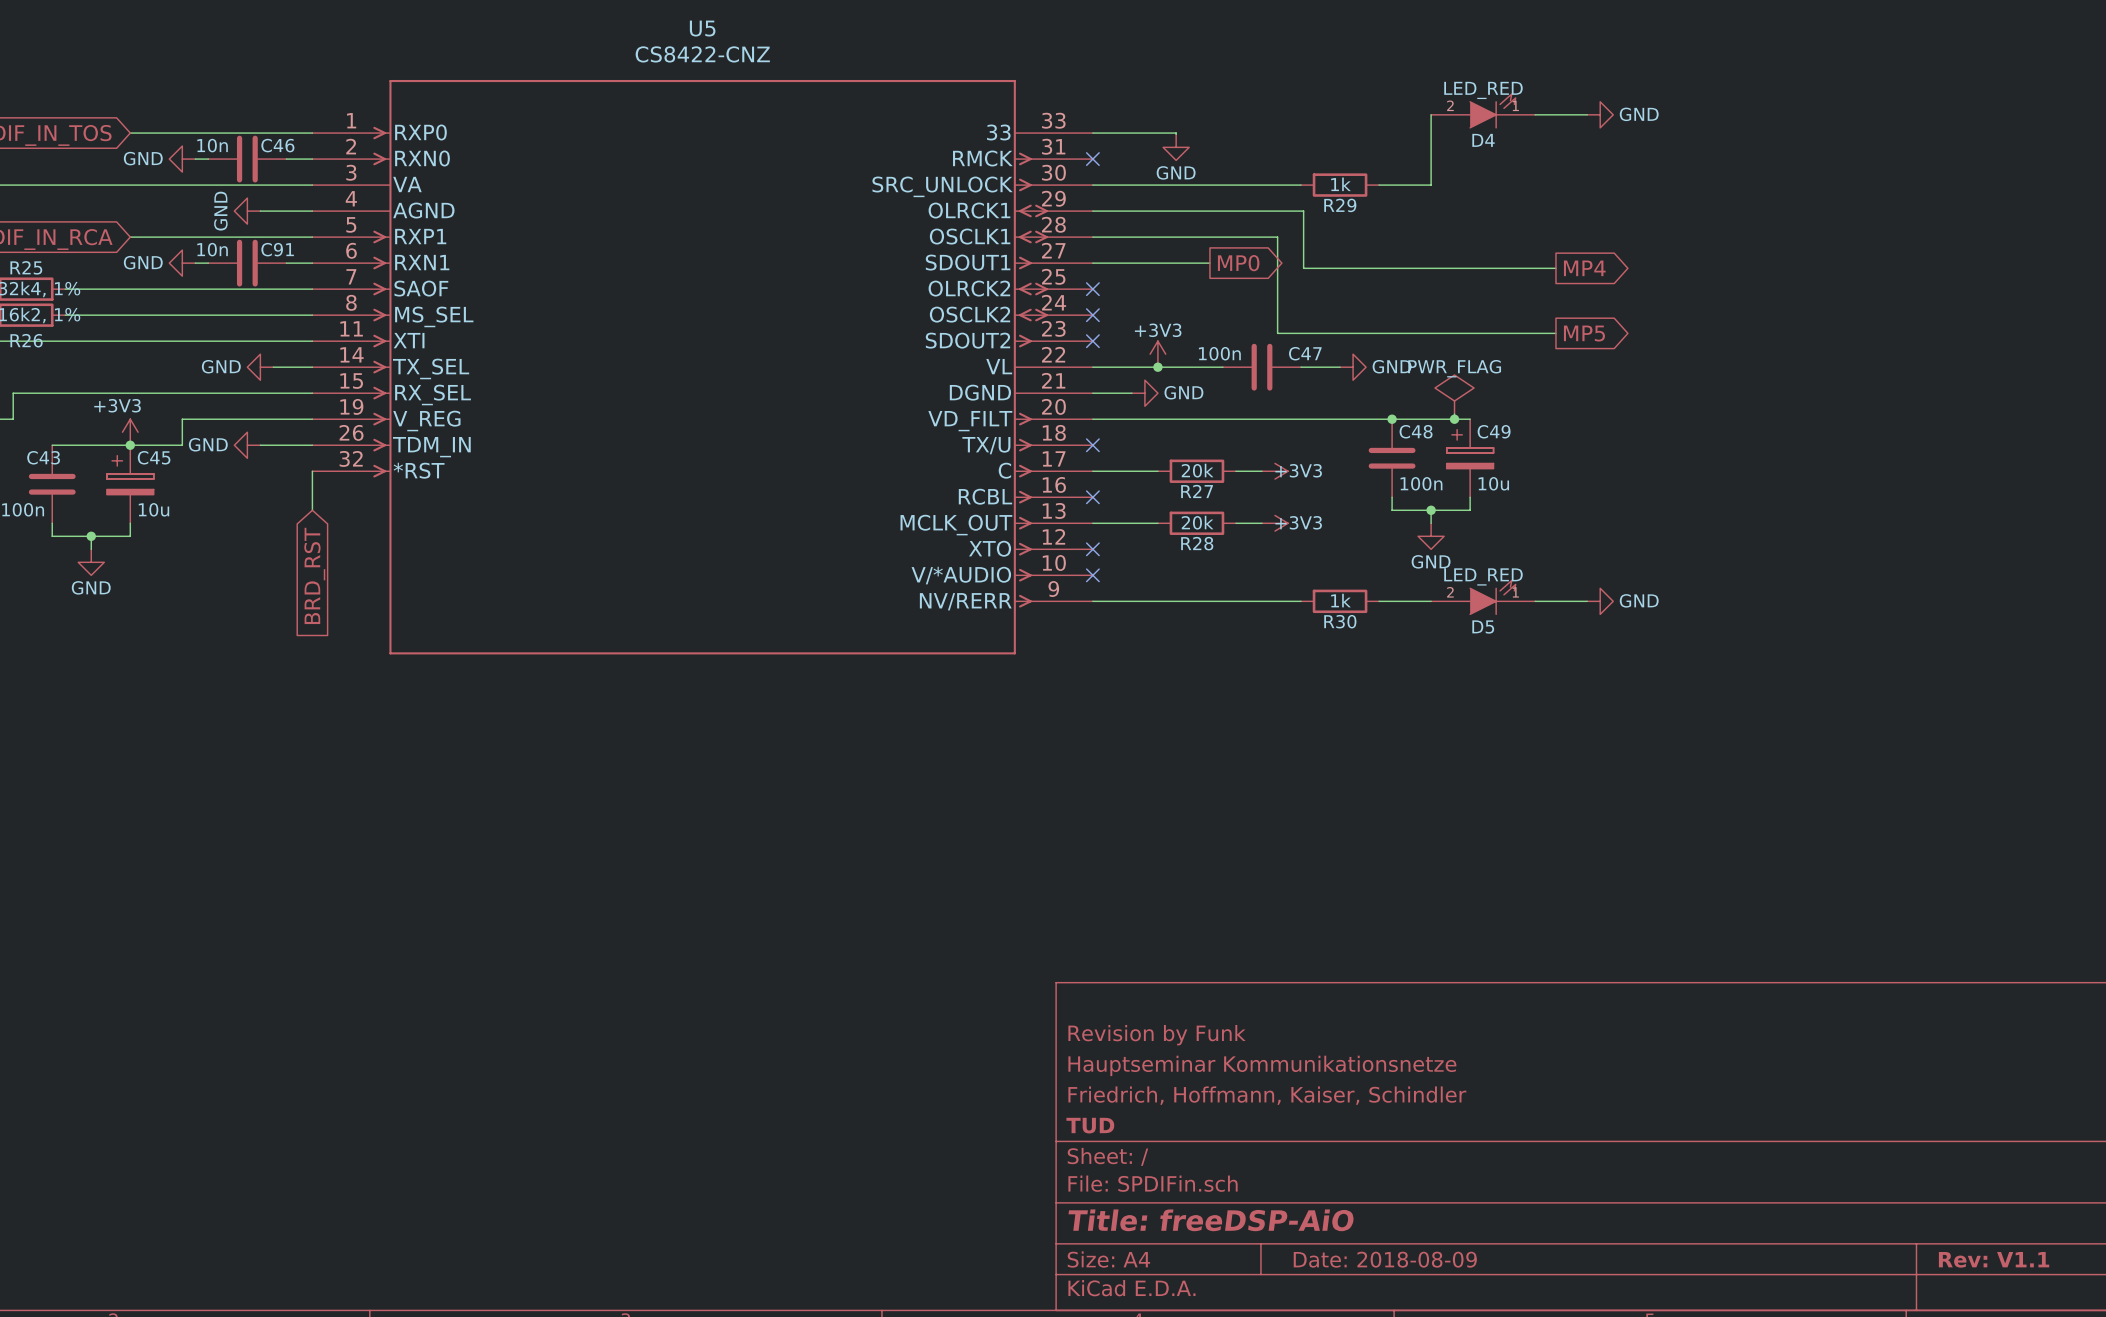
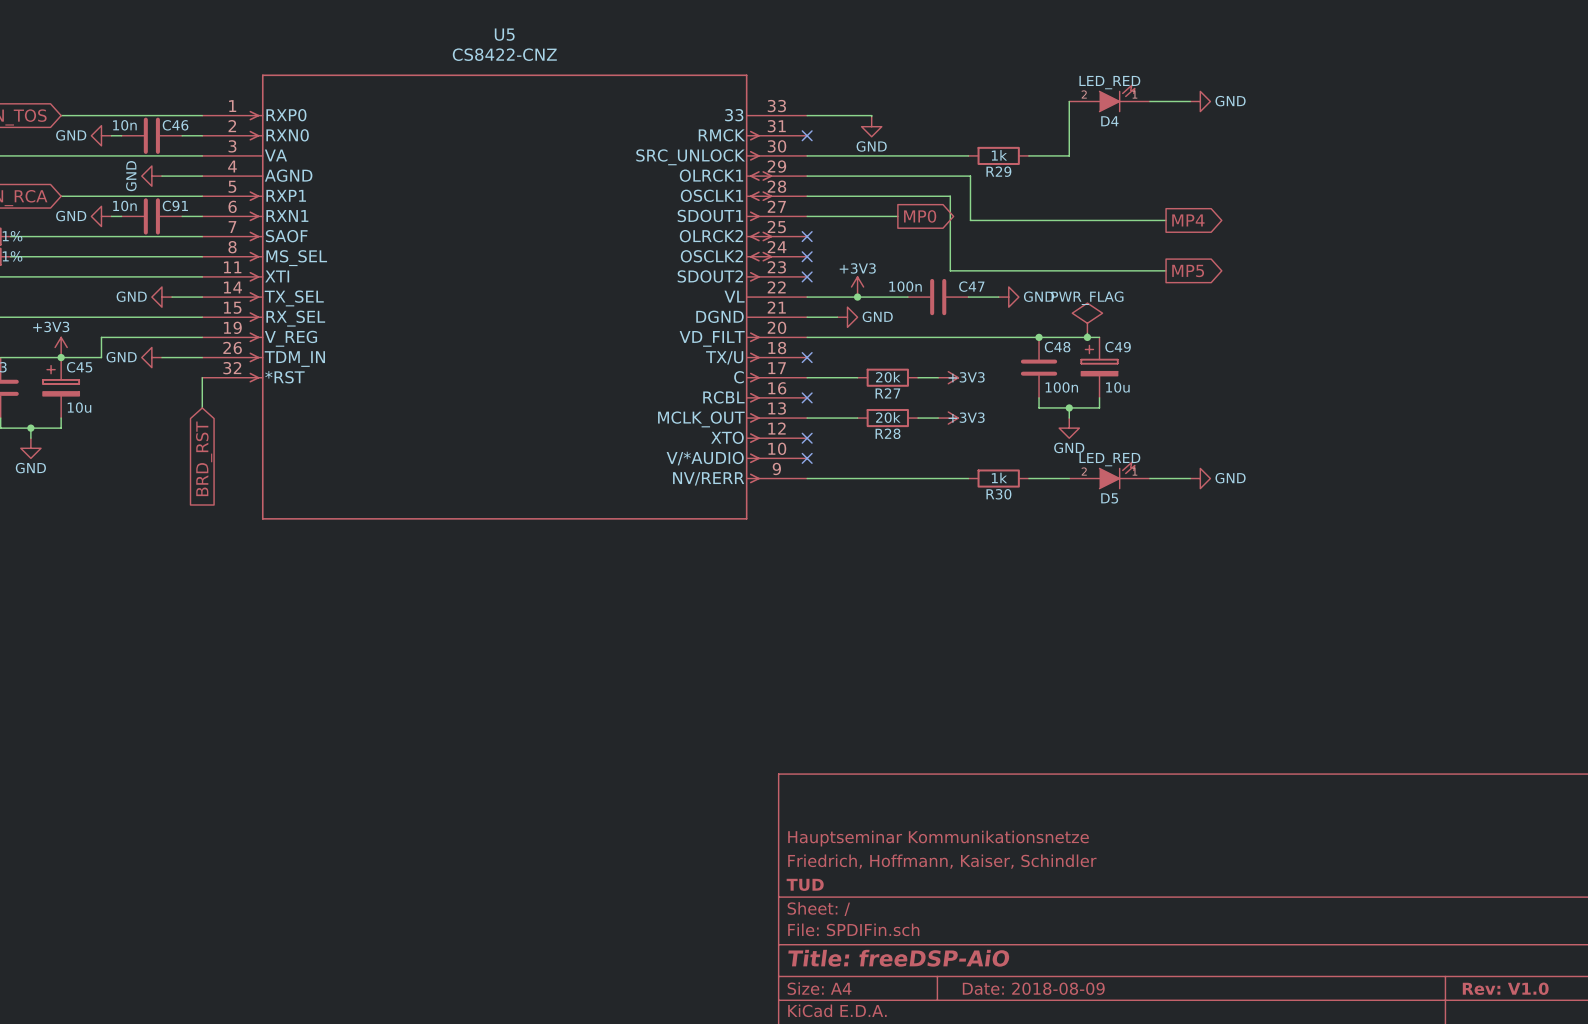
title block: Revision by Funk (1157, 1035) -> none
title block: Rev: V1.1 (1994, 1259) -> Rev: V1.0 (1505, 988)

